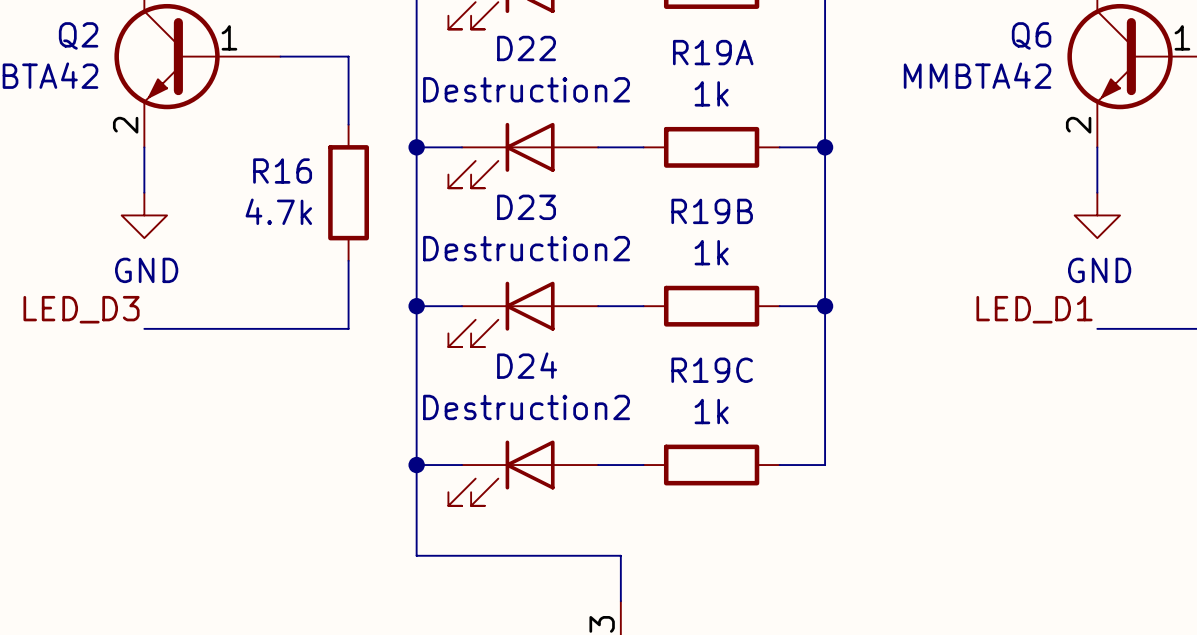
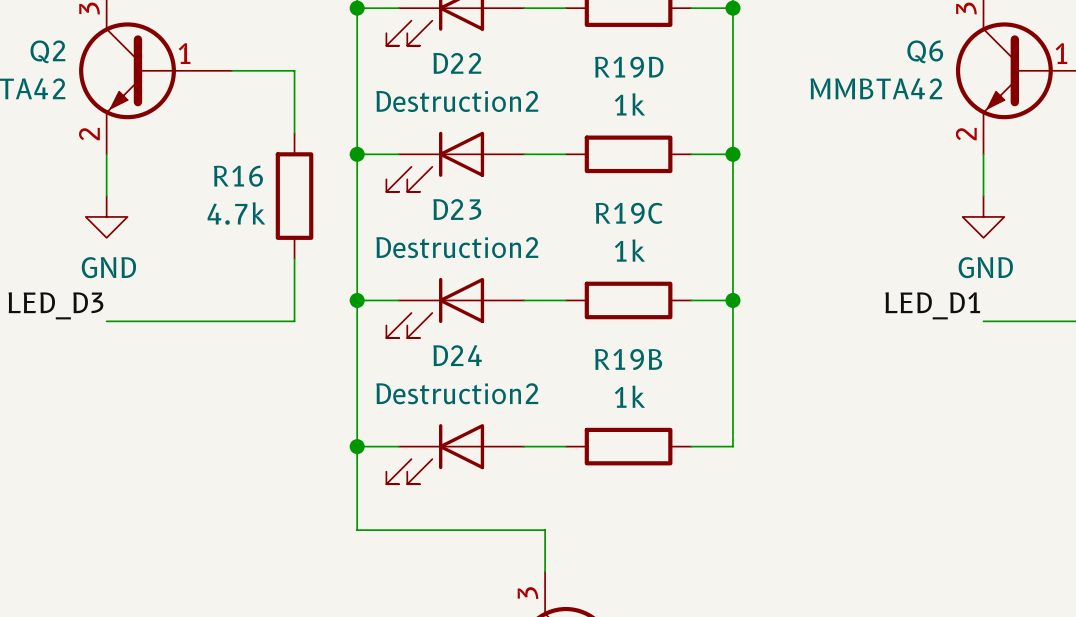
R19A name: R19A (713, 52) -> R19D (629, 67)
R19B name: R19B (712, 211) -> R19C (629, 213)
R19C name: R19C (712, 370) -> R19B (628, 359)

